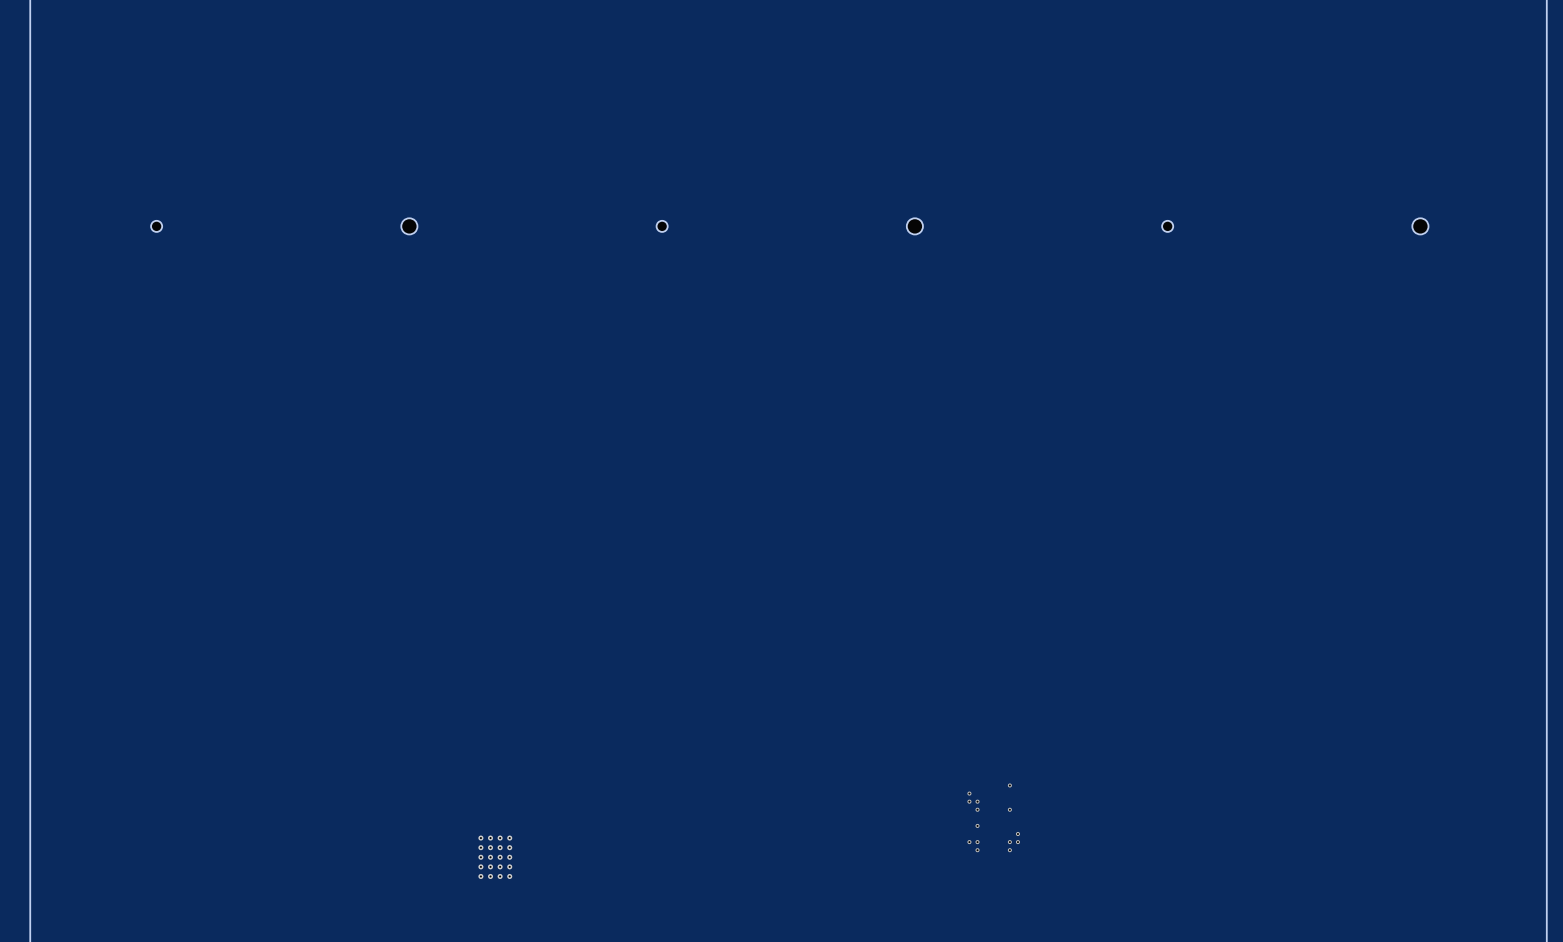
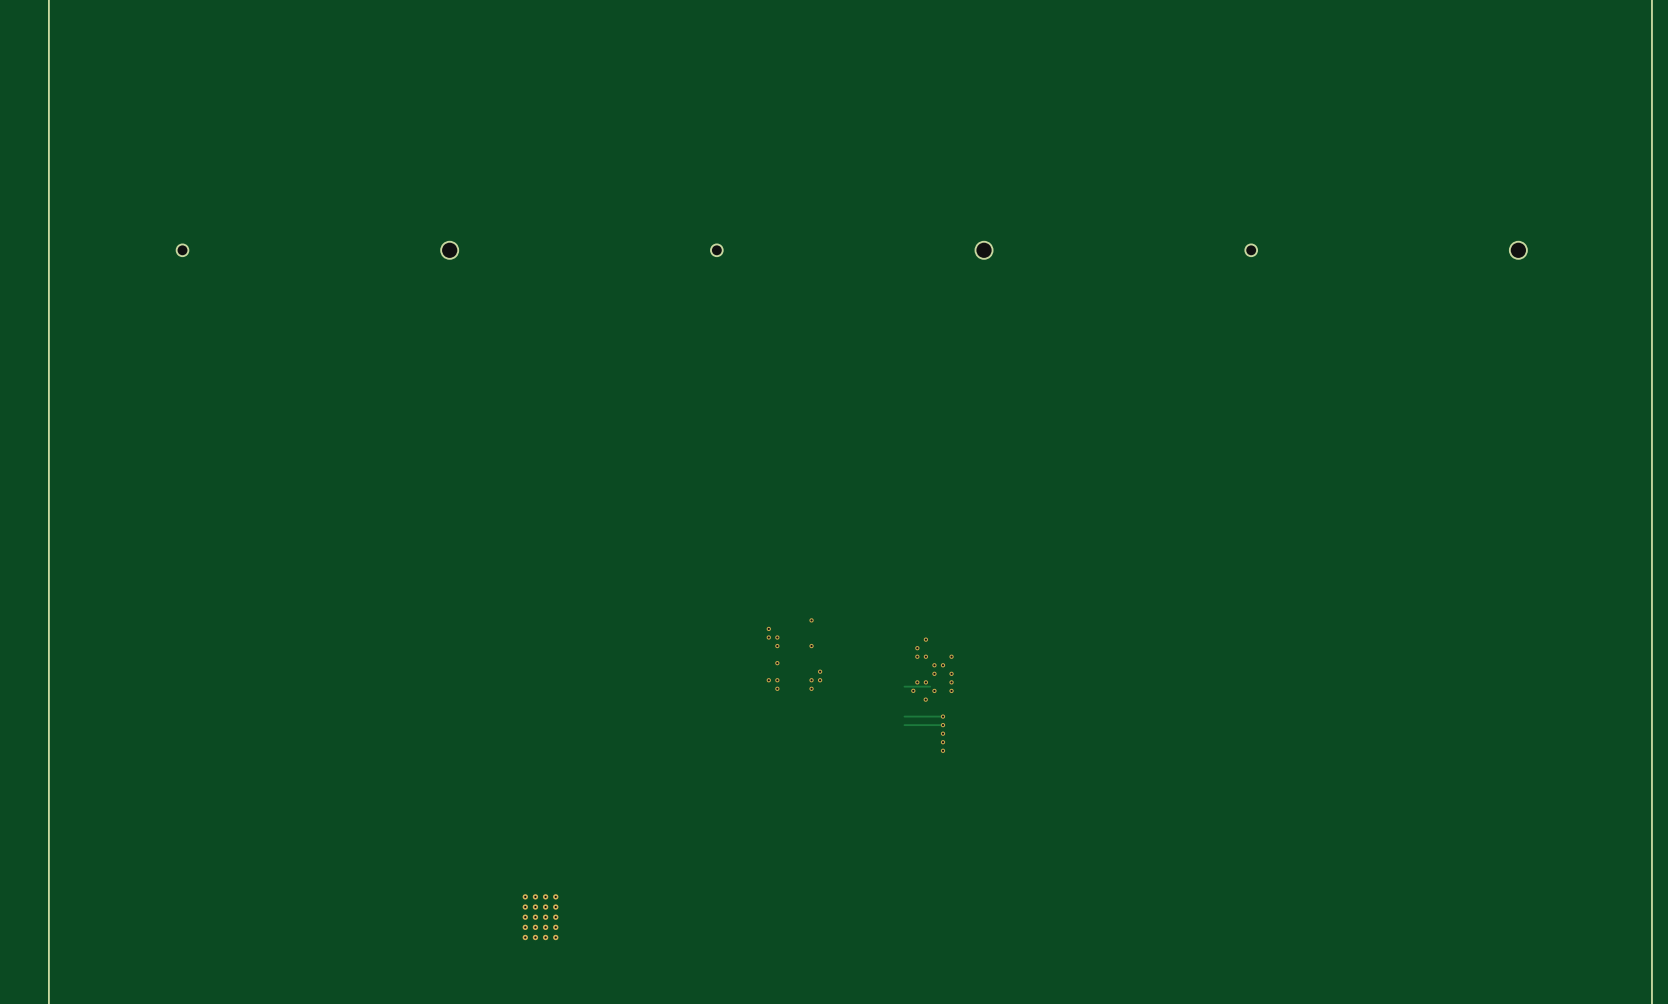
via: none -> (811, 620)
via: none -> (768, 628)
via: none -> (768, 637)
via: none -> (777, 637)
via: none -> (925, 639)
via: none -> (777, 646)
via: none -> (811, 646)
via: none -> (917, 648)
via: none -> (917, 656)
via: none -> (925, 656)
via: none -> (951, 656)
via: none -> (777, 663)
via: none -> (934, 665)
via: none -> (942, 665)
via: none -> (820, 671)
via: none -> (934, 673)
via: none -> (951, 673)
via: none -> (768, 680)
via: none -> (777, 680)
via: none -> (811, 680)
via: none -> (820, 680)
via: none -> (917, 682)
via: none -> (925, 682)
via: none -> (951, 682)
track: none -> (930, 686) (904, 686)
via: none -> (777, 688)
via: none -> (811, 688)
via: none -> (913, 690)
via: none -> (934, 690)
via: none -> (951, 690)
via: none -> (925, 699)
track: none -> (942, 716) (904, 716)
via: none -> (942, 716)
track: none -> (942, 725) (904, 725)
via: none -> (942, 725)
via: none -> (942, 733)
via: none -> (942, 742)
via: none -> (942, 750)
via: (1009, 785) -> none
via: (969, 793) -> none
via: (969, 801) -> none
via: (977, 801) -> none
via: (977, 809) -> none
via: (1009, 809) -> none
via: (977, 825) -> none
via: (1017, 834) -> none
via: (969, 842) -> none
via: (977, 842) -> none
via: (1009, 842) -> none
via: (1017, 842) -> none
via: (977, 850) -> none
via: (1009, 850) -> none

